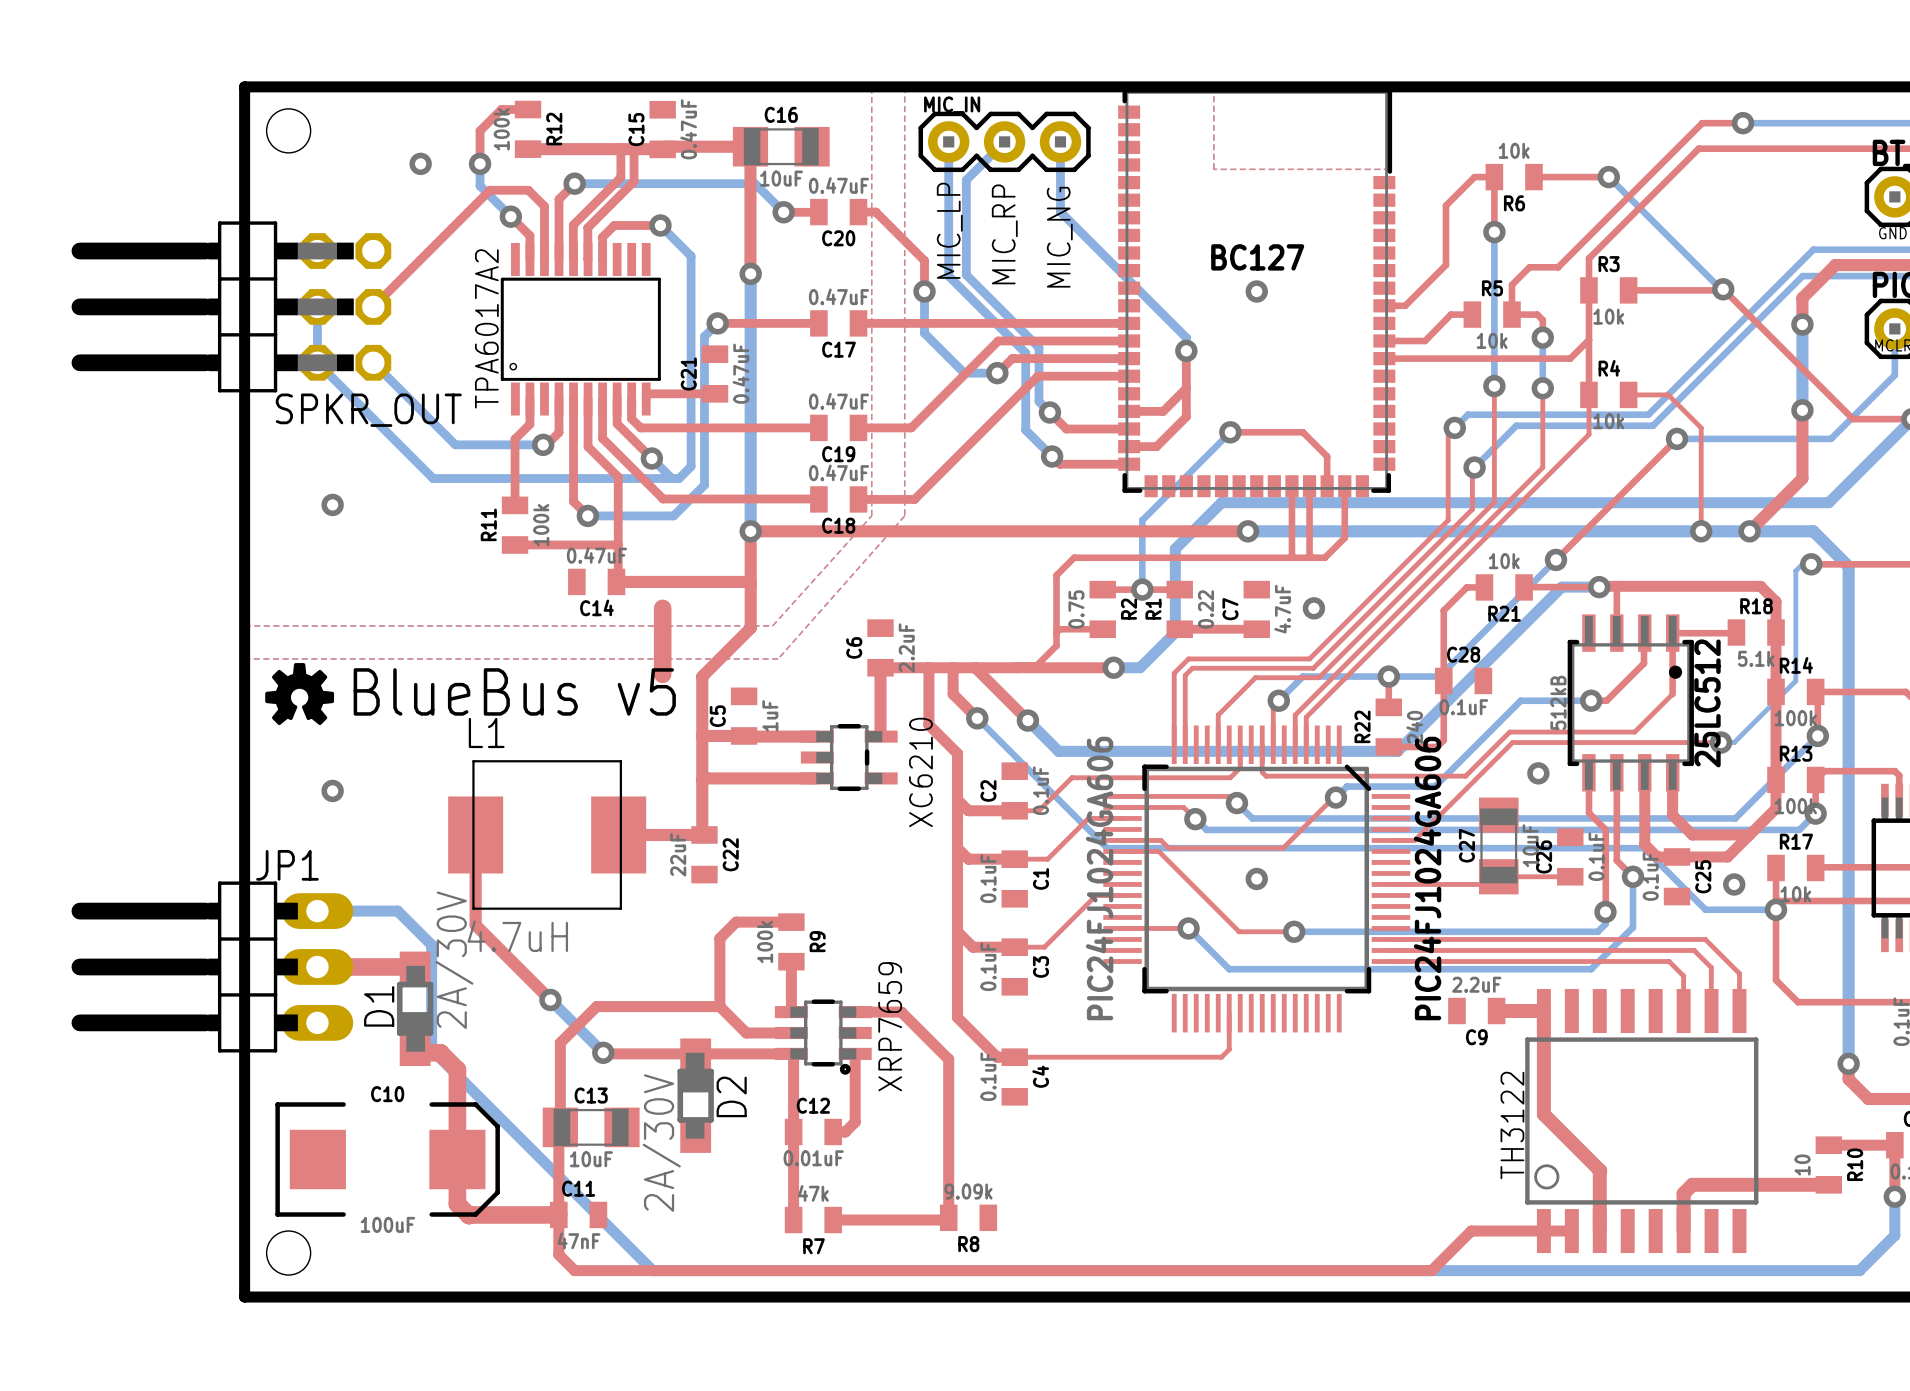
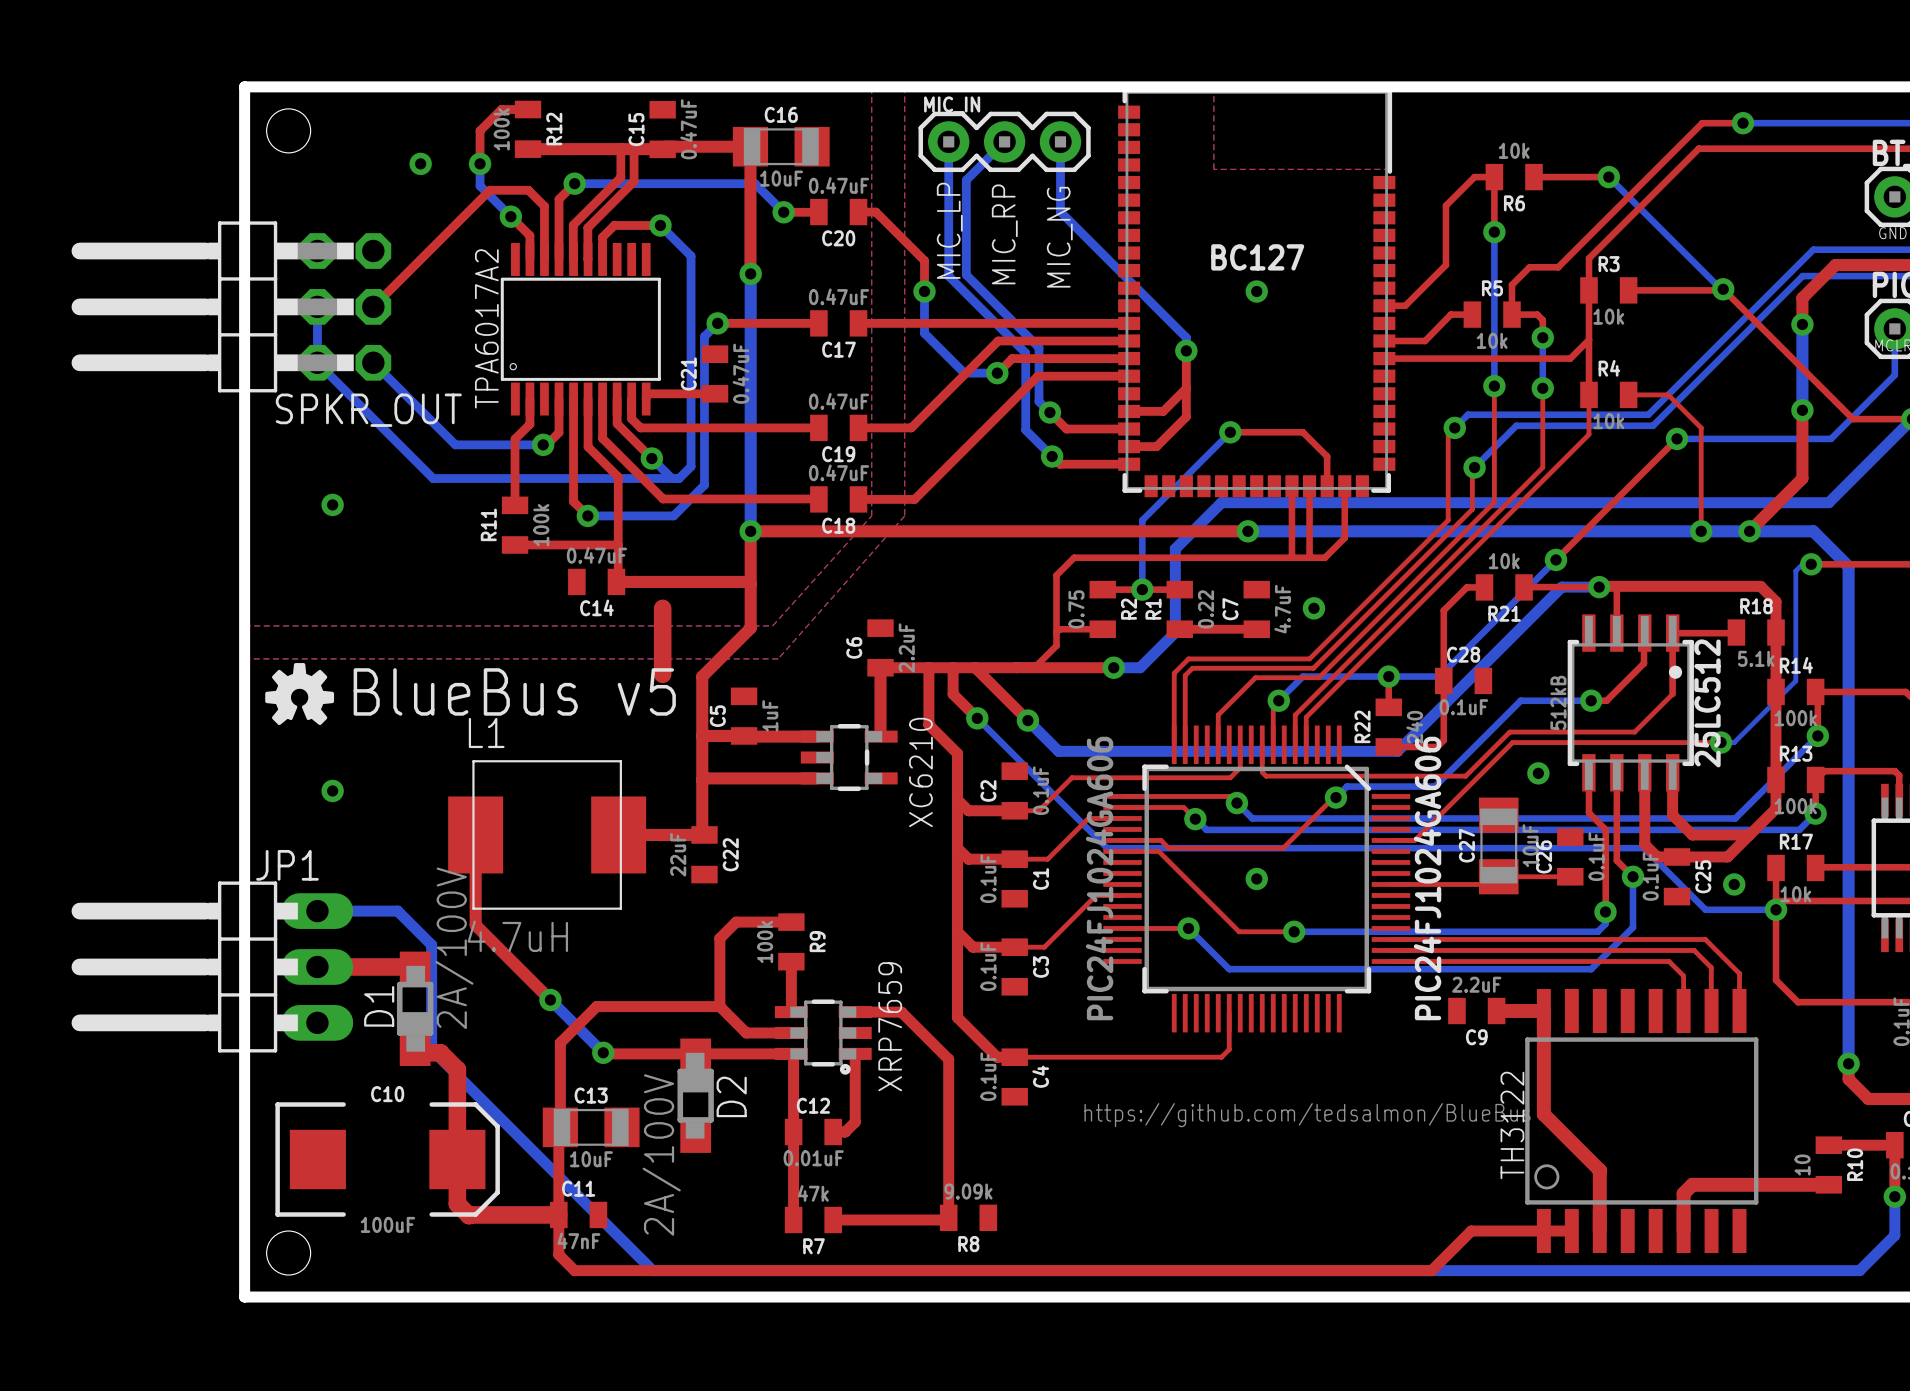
D1 value: 2A/30V (454, 960) -> 2A/100V (454, 948)
text: none -> https://github.com/tedsalmon/BlueBus (1307, 1115)
D2 value: 2A/30V (661, 1143) -> 2A/100V (661, 1155)

